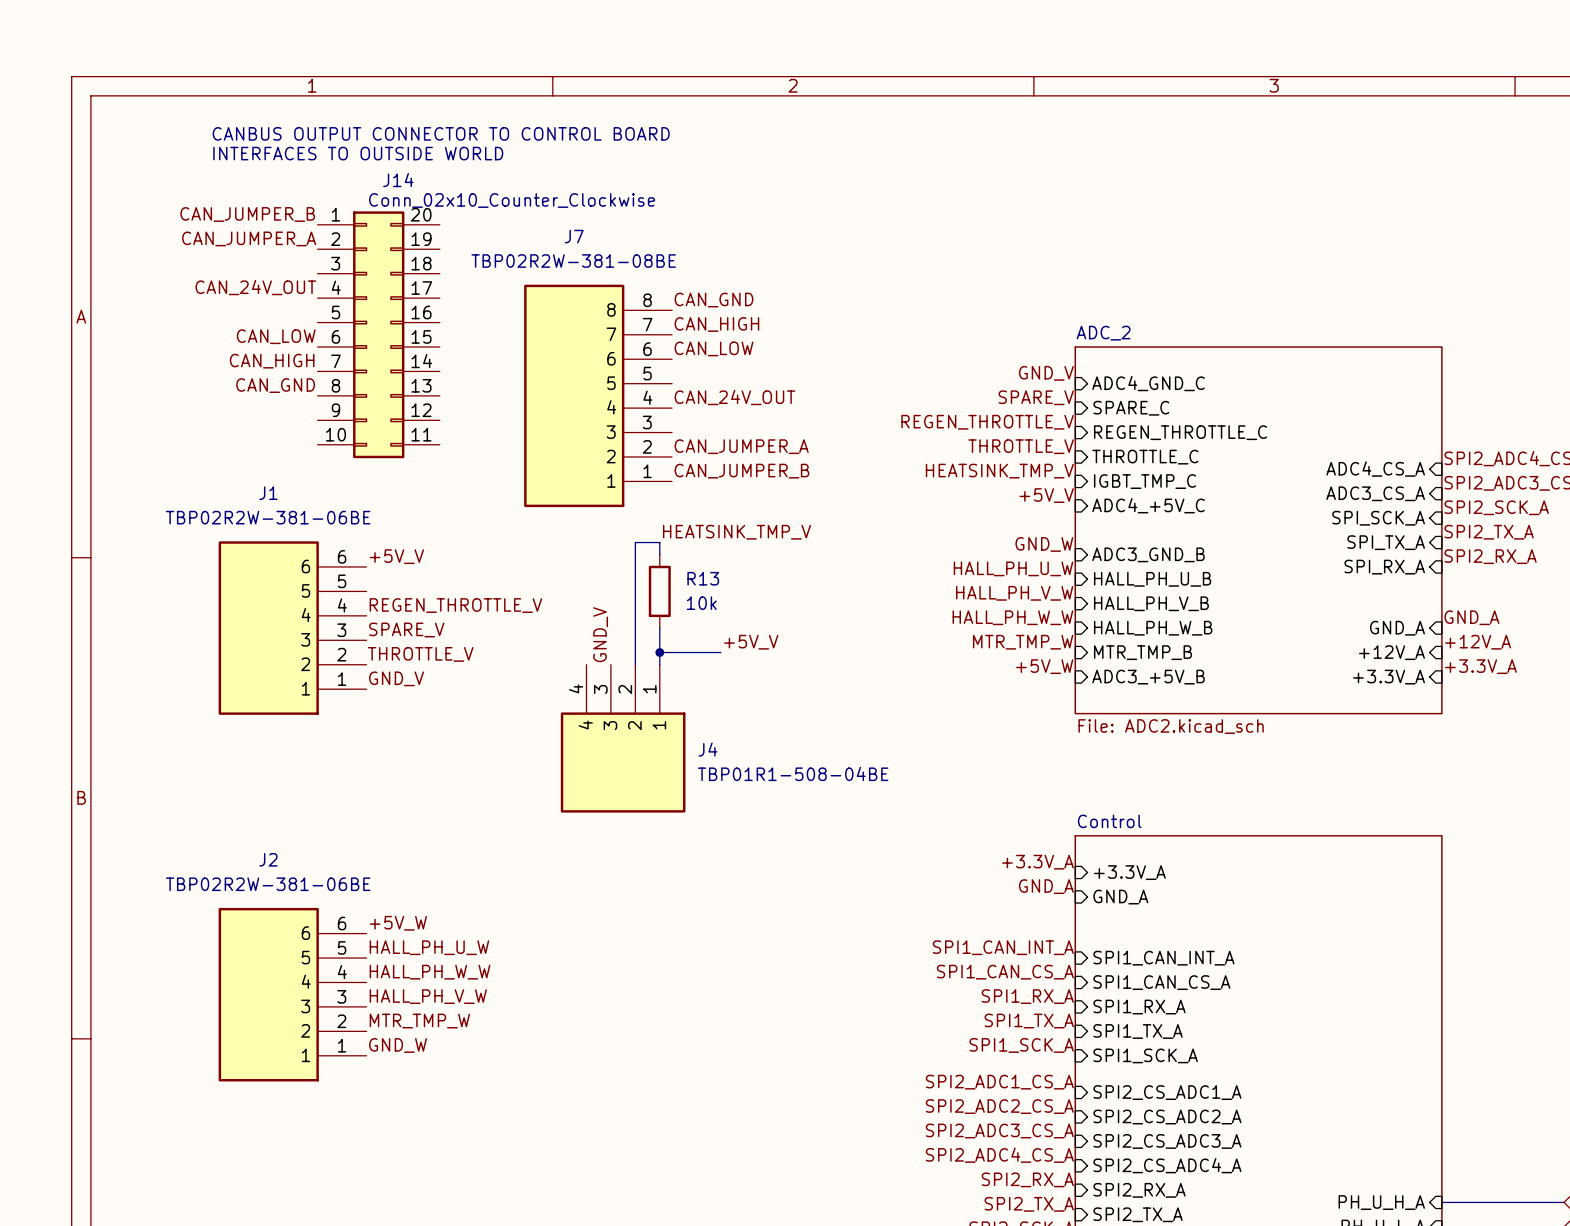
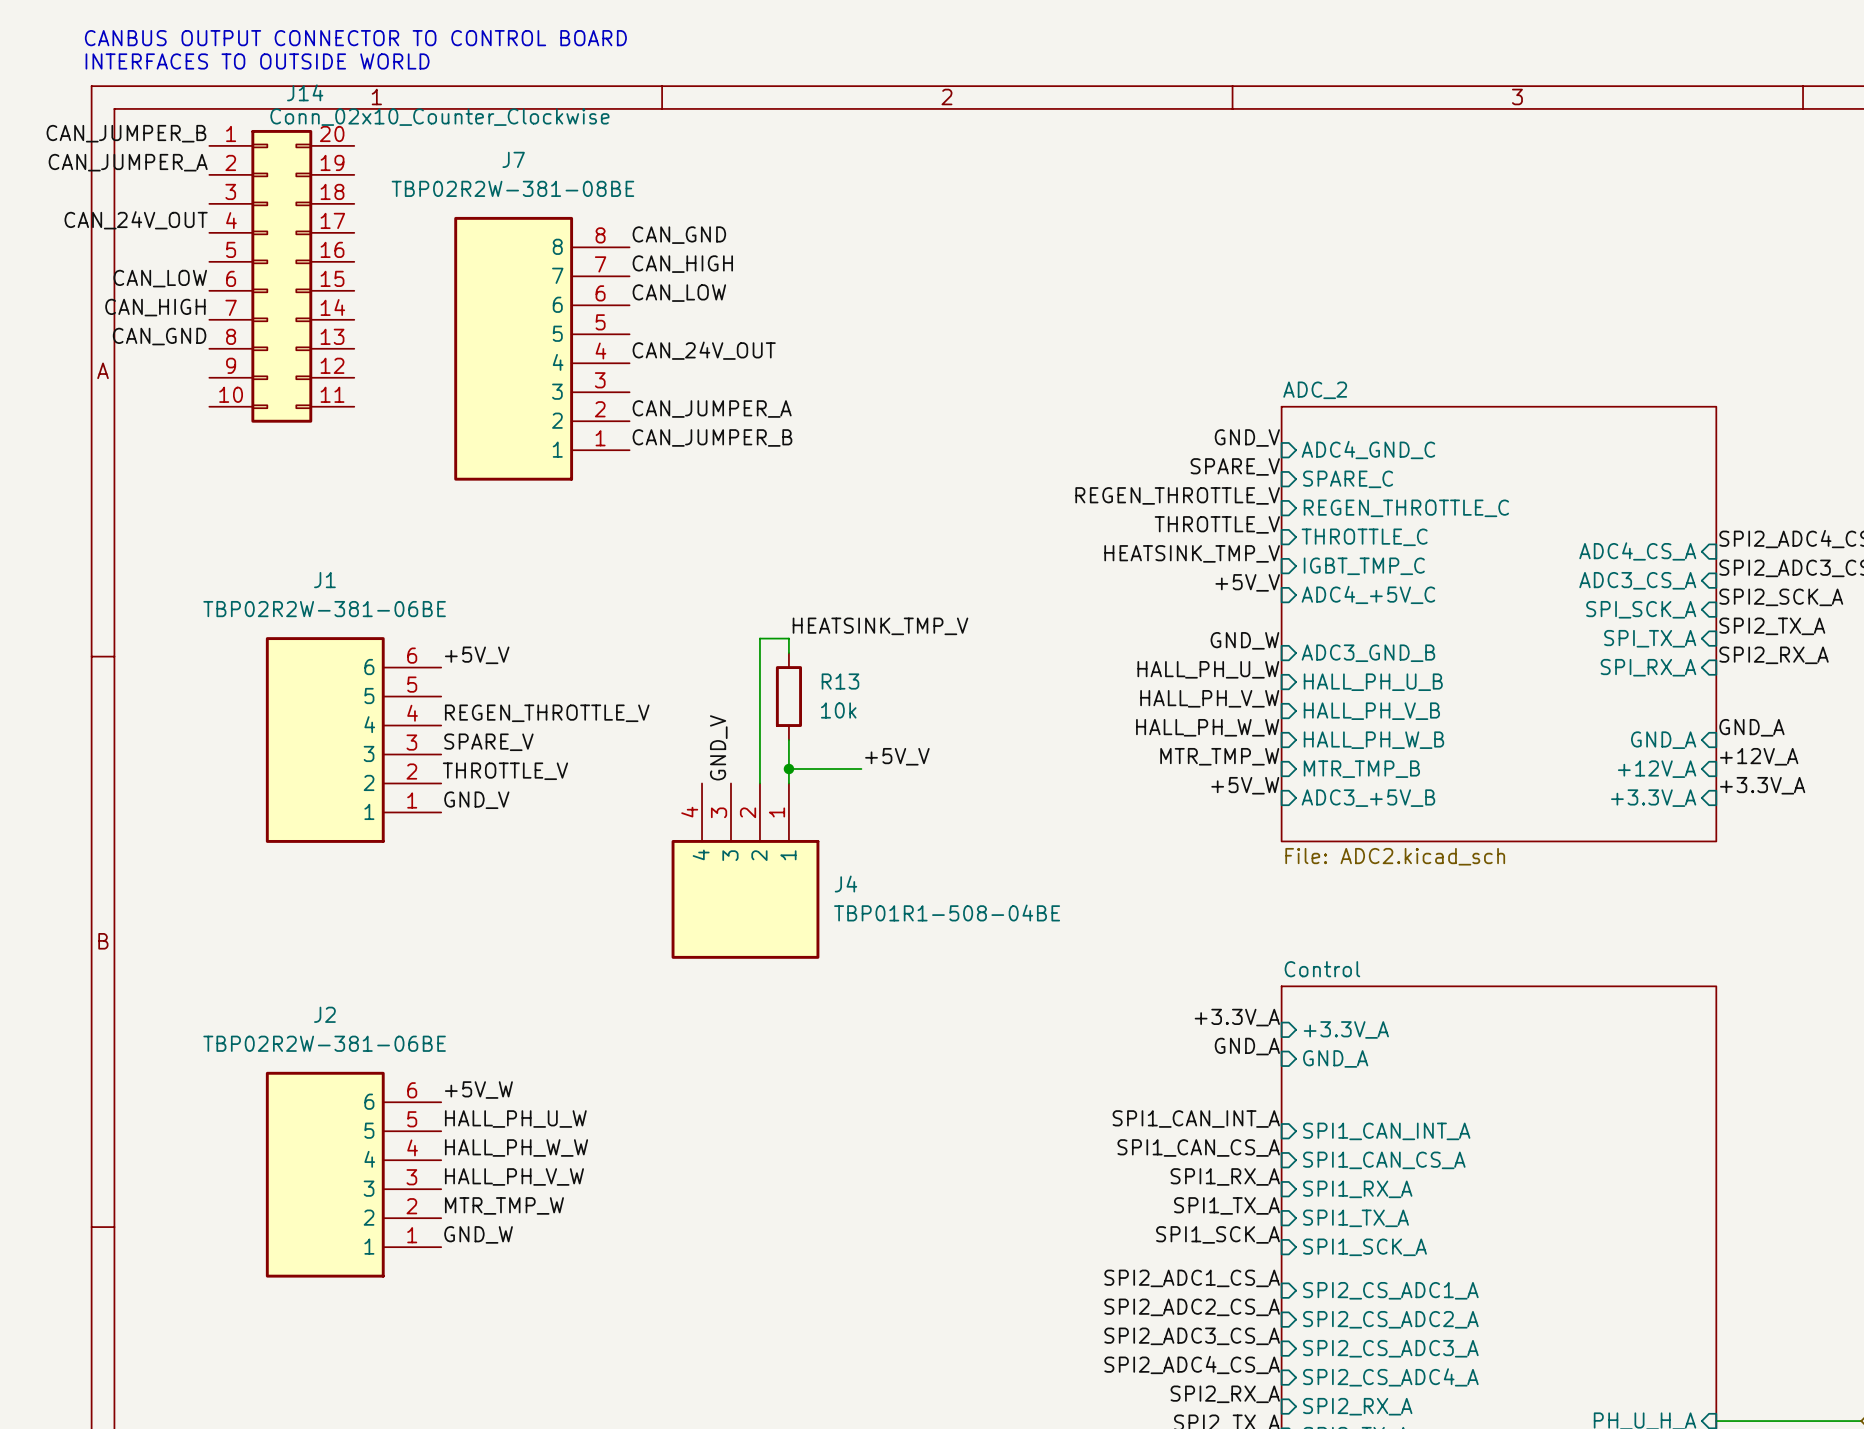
label: none -> CAN_JUMPER_B (126, 133)
text position: CANBUS OUTPUT CONNECTOR TO CONTROL BOARD (441, 133) -> CANBUS OUTPUT CONNECTOR TO CONTROL BOARD (355, 38)
label: none -> CAN_JUMPER_A (128, 162)
text position: INTERFACES TO OUTSIDE WORLD (358, 153) -> INTERFACES TO OUTSIDE WORLD (257, 61)
label: none -> CAN_24V_OUT (136, 220)
label: none -> CAN_GND (679, 235)
label: CAN_JUMPER_B (247, 214) -> none
label: none -> CAN_HIGH (682, 264)
label: none -> CAN_LOW (160, 278)
label: CAN_JUMPER_A (249, 238) -> none
label: none -> CAN_LOW (679, 293)
label: none -> CAN_HIGH (155, 307)
label: none -> CAN_GND (159, 336)
label: CAN_24V_OUT (255, 287) -> none
label: none -> CAN_24V_OUT (704, 350)
label: CAN_GND (714, 300) -> none
label: CAN_HIGH (716, 324) -> none
J14 position: (378, 334) -> (281, 276)
label: CAN_LOW (276, 336) -> none
label: none -> CAN_JUMPER_A (712, 408)
label: CAN_LOW (714, 348) -> none
label: CAN_HIGH (272, 361) -> none
label: none -> CAN_JUMPER_B (712, 437)
label: CAN_GND (275, 385) -> none
J7 position: (598, 395) -> (541, 348)
label: CAN_24V_OUT (734, 397) -> none
label: CAN_JUMPER_A (741, 446) -> none
label: CAN_JUMPER_B (741, 471) -> none

